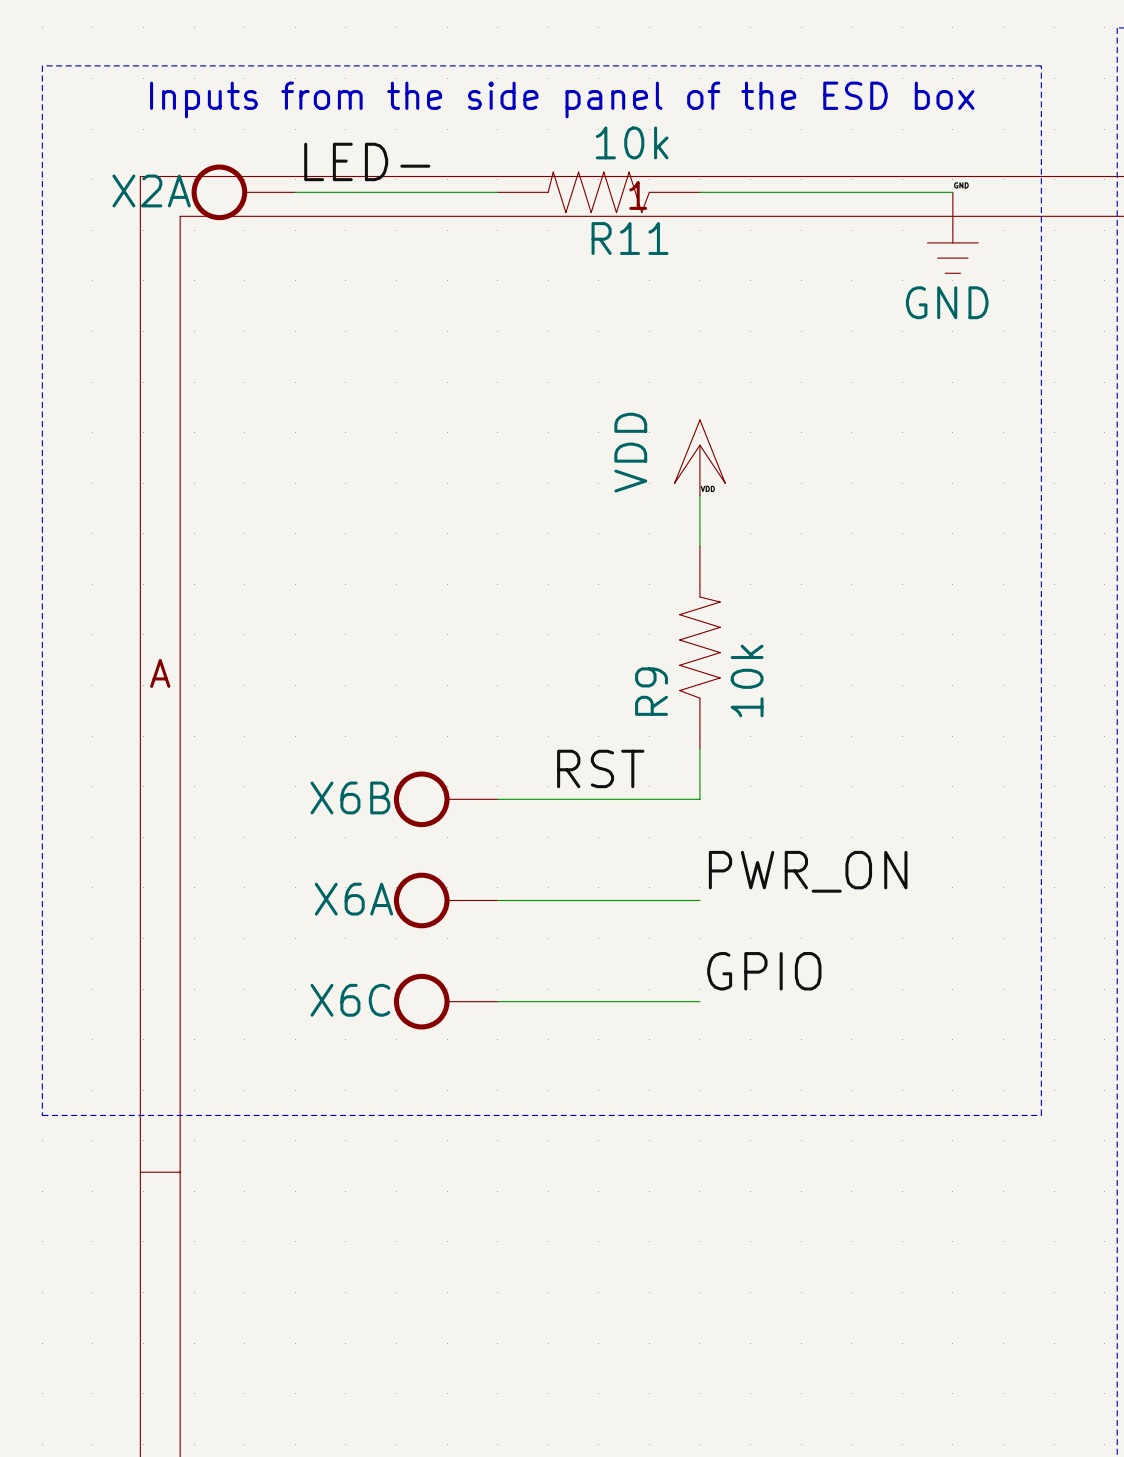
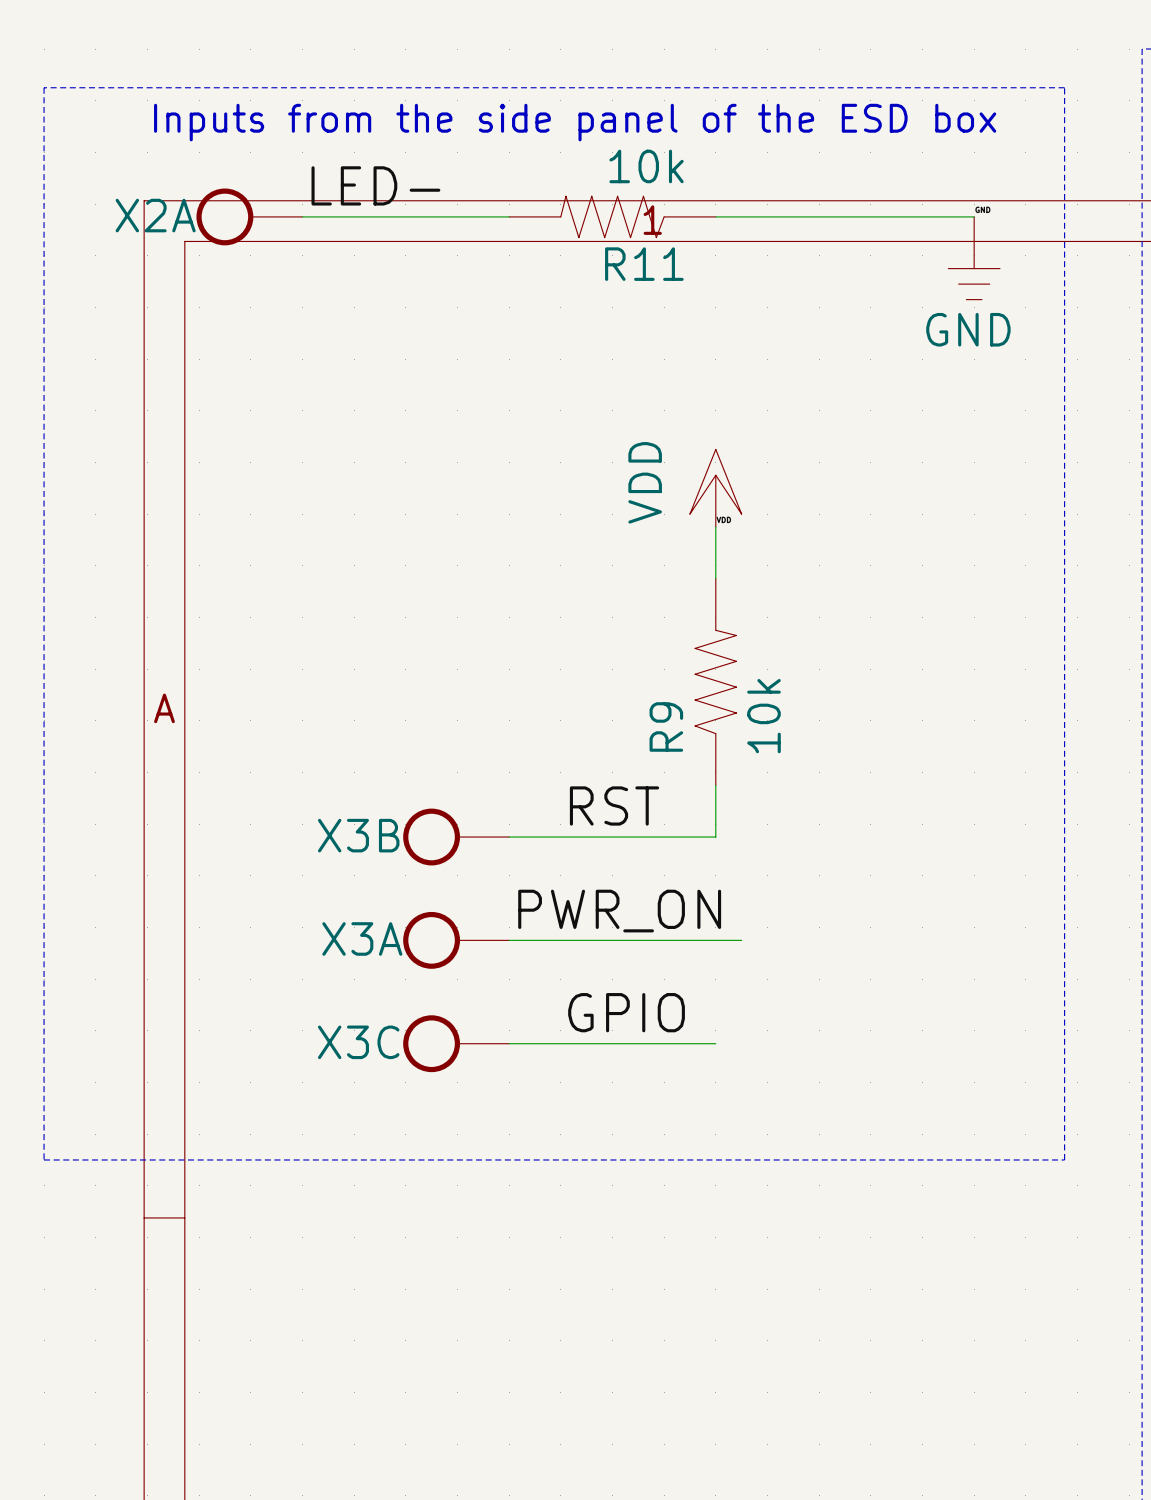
X6B name: X6B (350, 797) -> X3B (358, 835)
label position: PWR_ON (808, 871) -> PWR_ON (619, 911)
X6A name: X6A (353, 899) -> X3A (362, 938)
wire: none -> (715, 940) (741, 940)
label position: GPIO (764, 971) -> GPIO (626, 1012)
X6C name: X6C (350, 1000) -> X3C (358, 1042)

